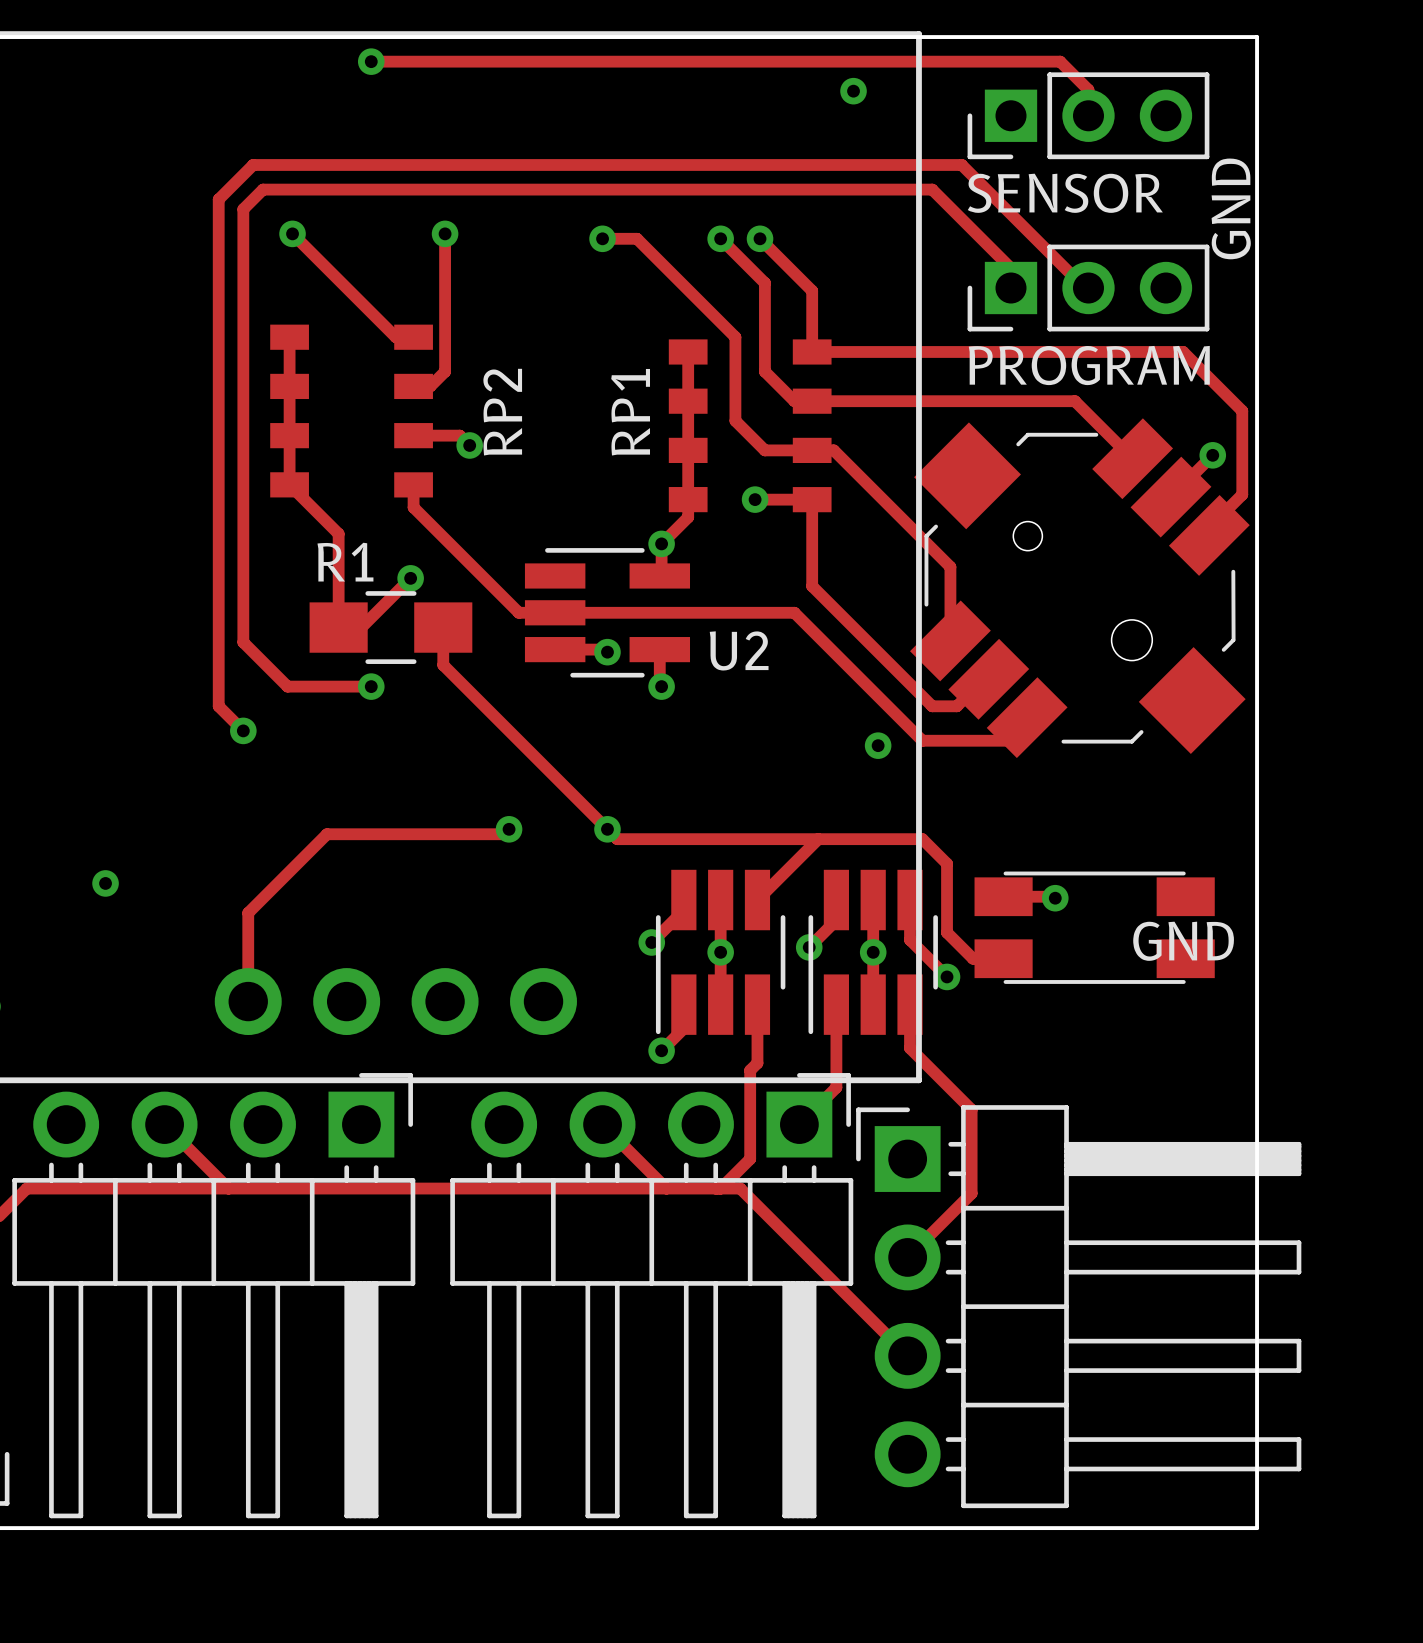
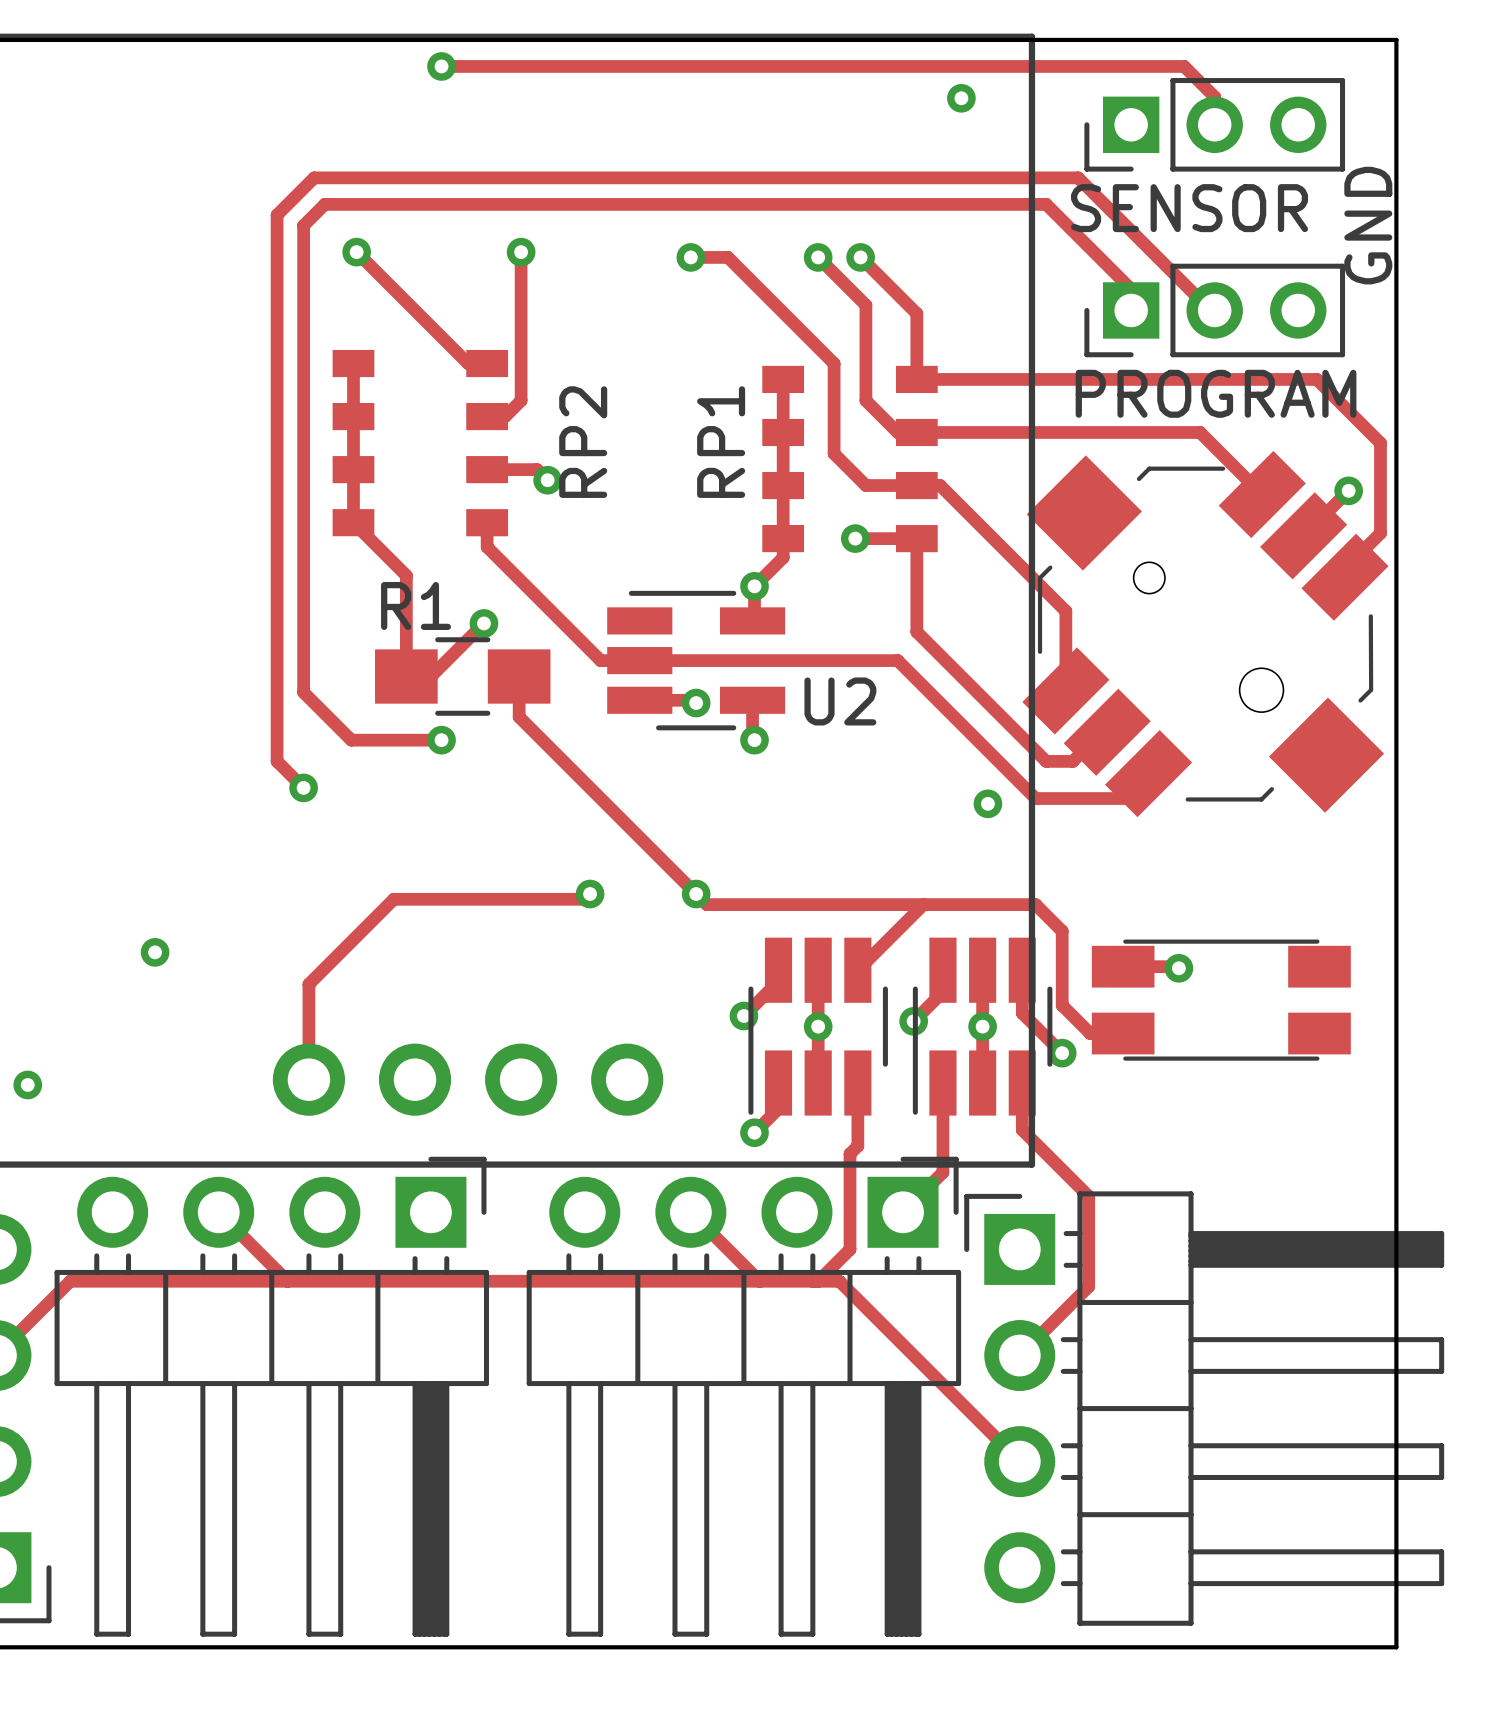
text: GND (1183, 941) -> none

